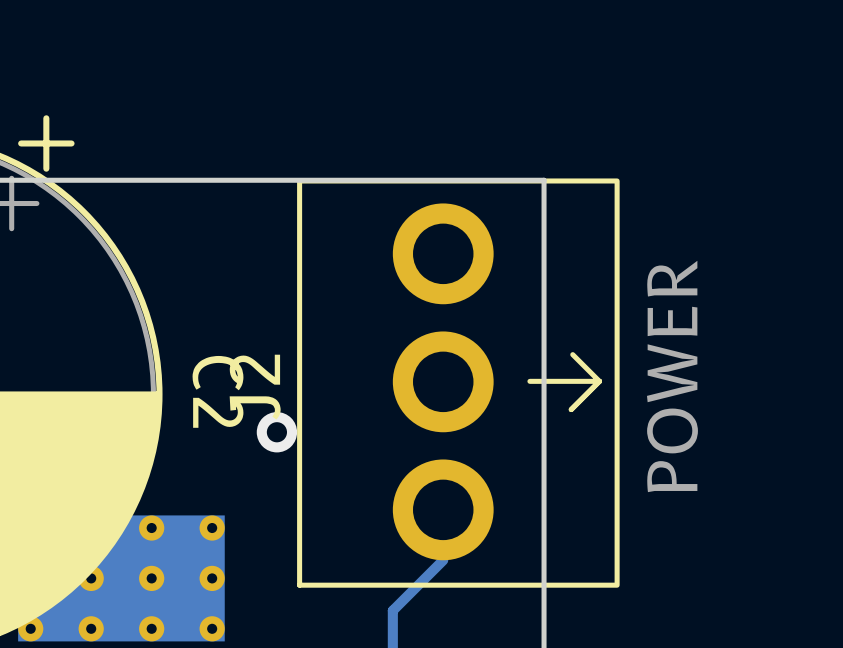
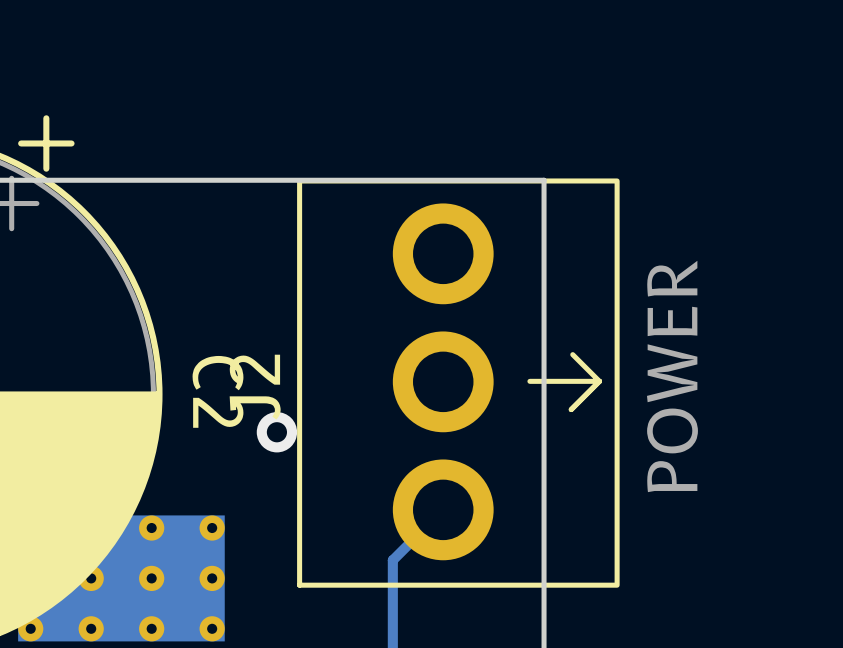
track: (443, 560) (392, 610) -> (443, 509) (392, 560) (392, 610)

